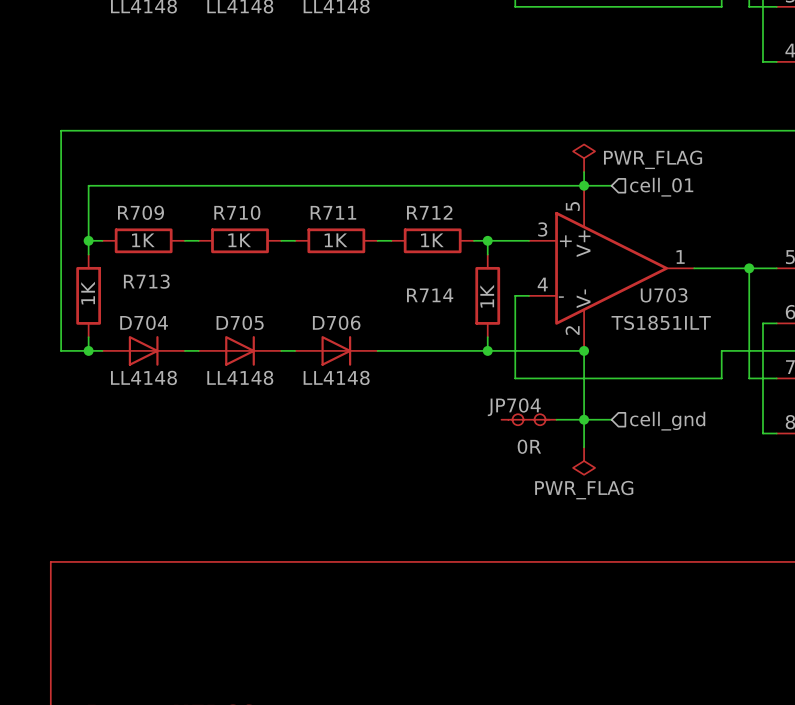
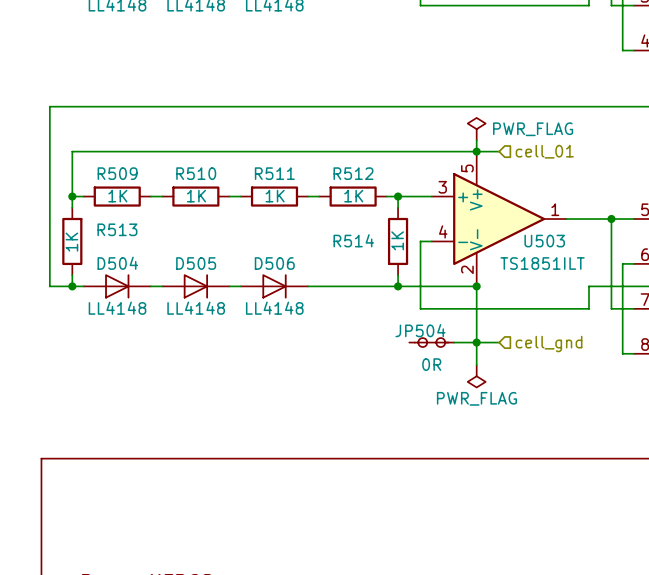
R709 name: R709 (140, 212) -> R509 (117, 173)
R710 name: R710 (237, 212) -> R510 (196, 173)
R711 name: R711 (333, 212) -> R511 (274, 173)
R712 name: R712 (429, 212) -> R512 (353, 173)
R713 name: R713 (146, 281) -> R513 (117, 229)
R714 name: R714 (430, 295) -> R514 (353, 240)
U703 name: U703 (664, 295) -> U503 (544, 241)
D704 name: D704 (144, 322) -> D504 (117, 263)
D705 name: D705 (240, 322) -> D505 (196, 263)
D706 name: D706 (336, 322) -> D506 (274, 263)
JP704 name: JP704 (514, 407) -> JP504 (420, 330)

